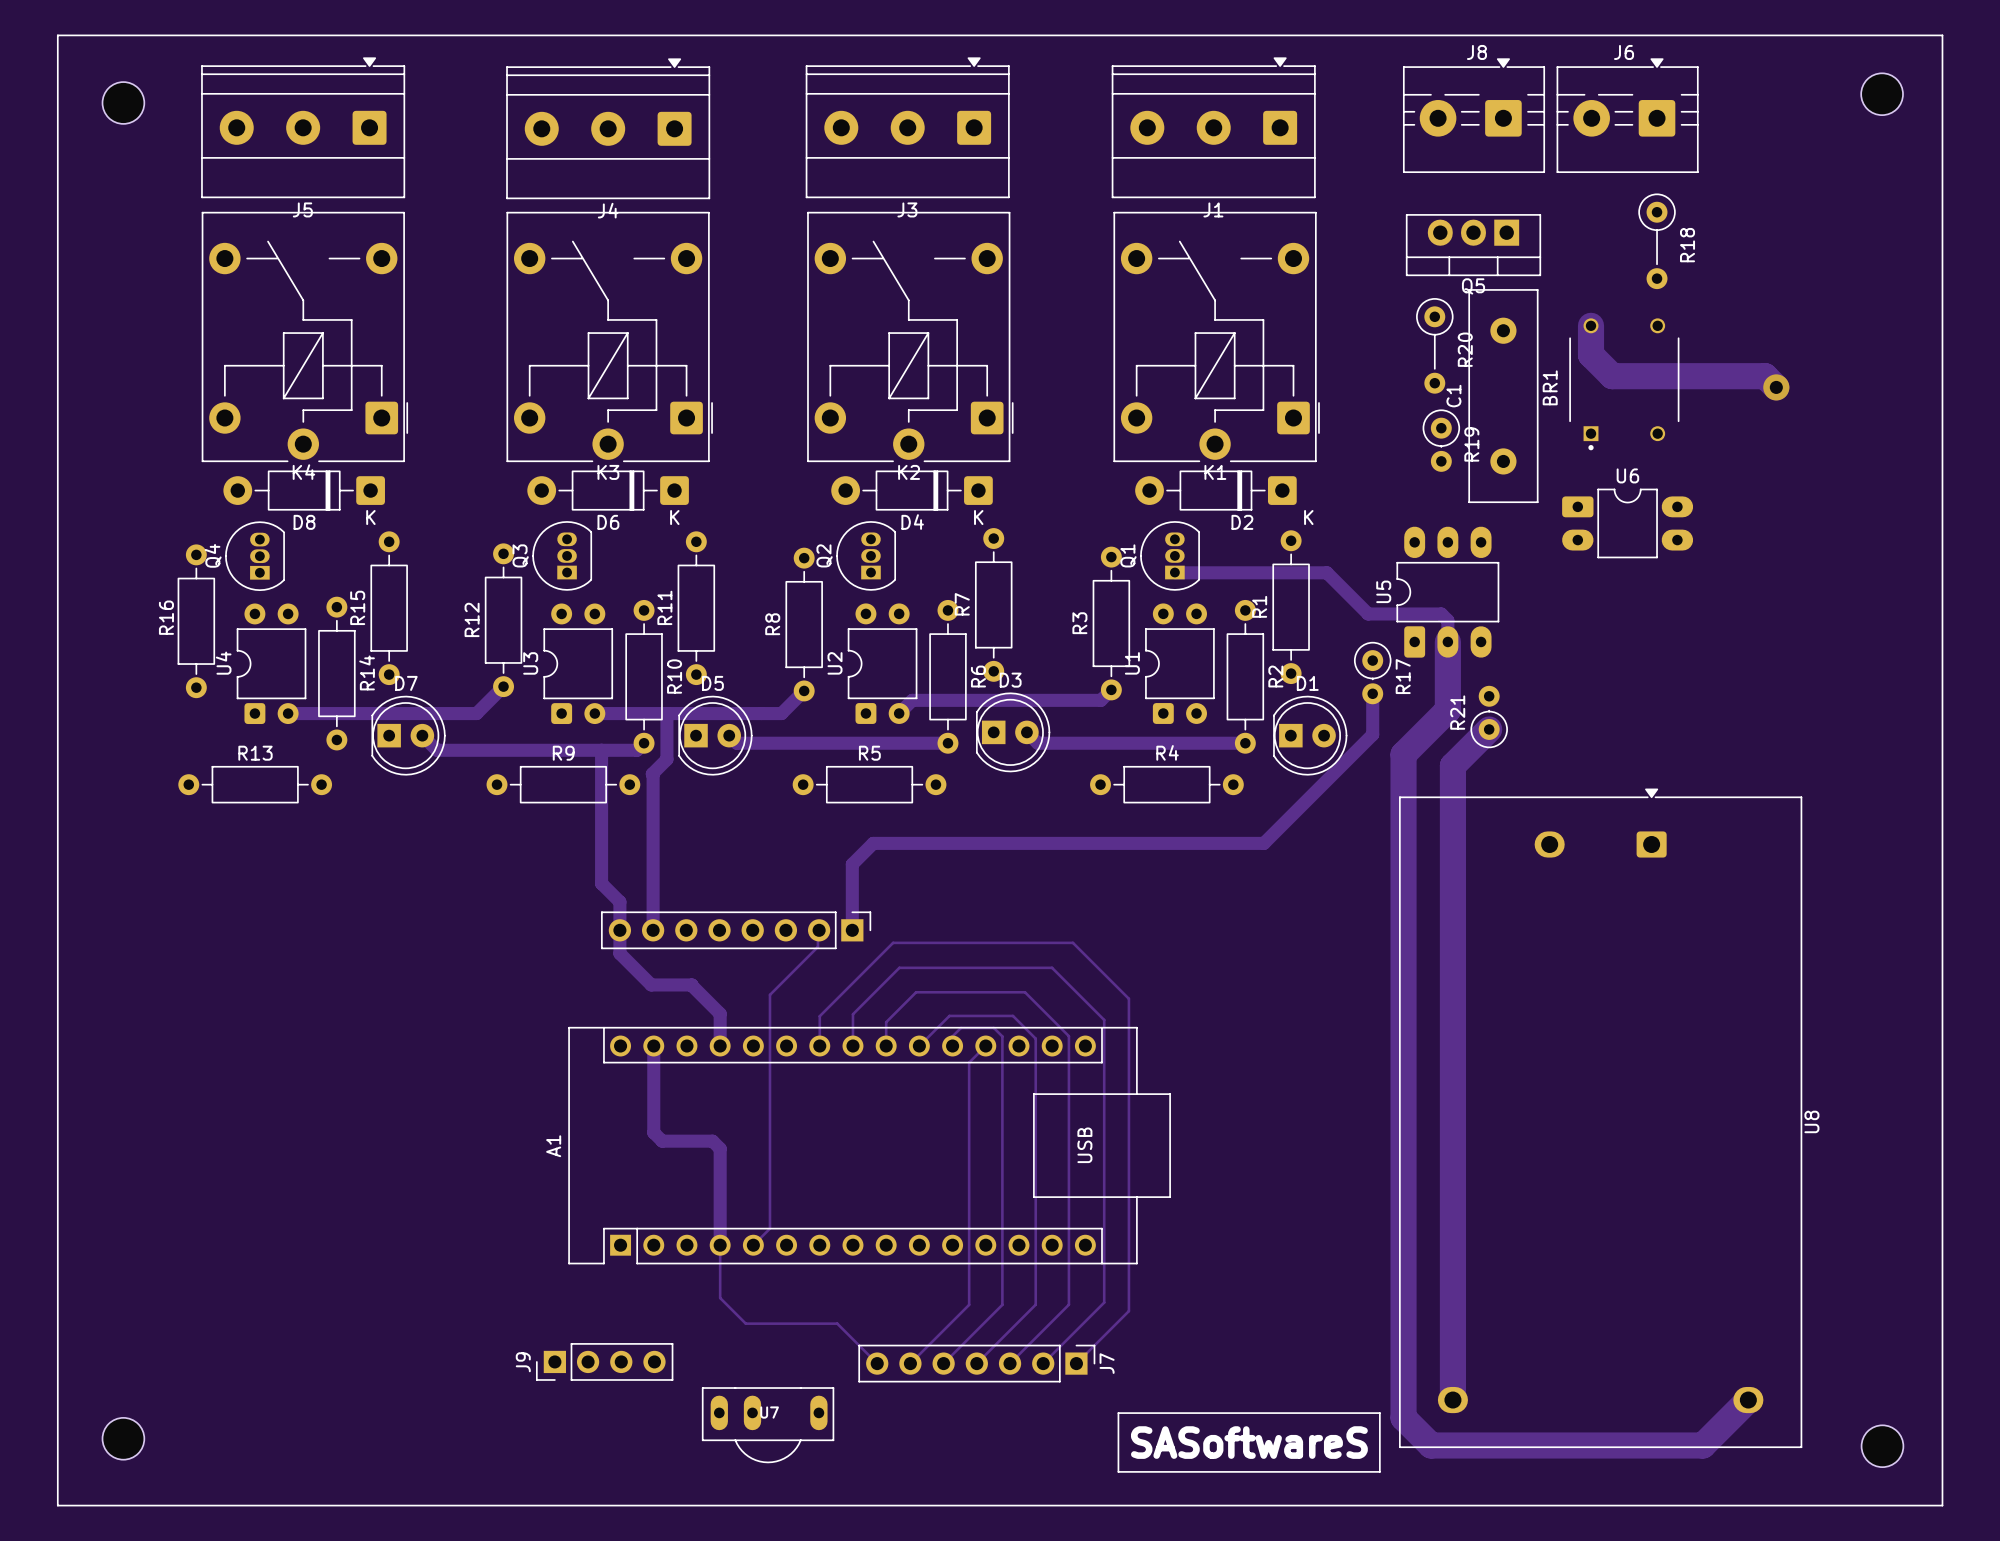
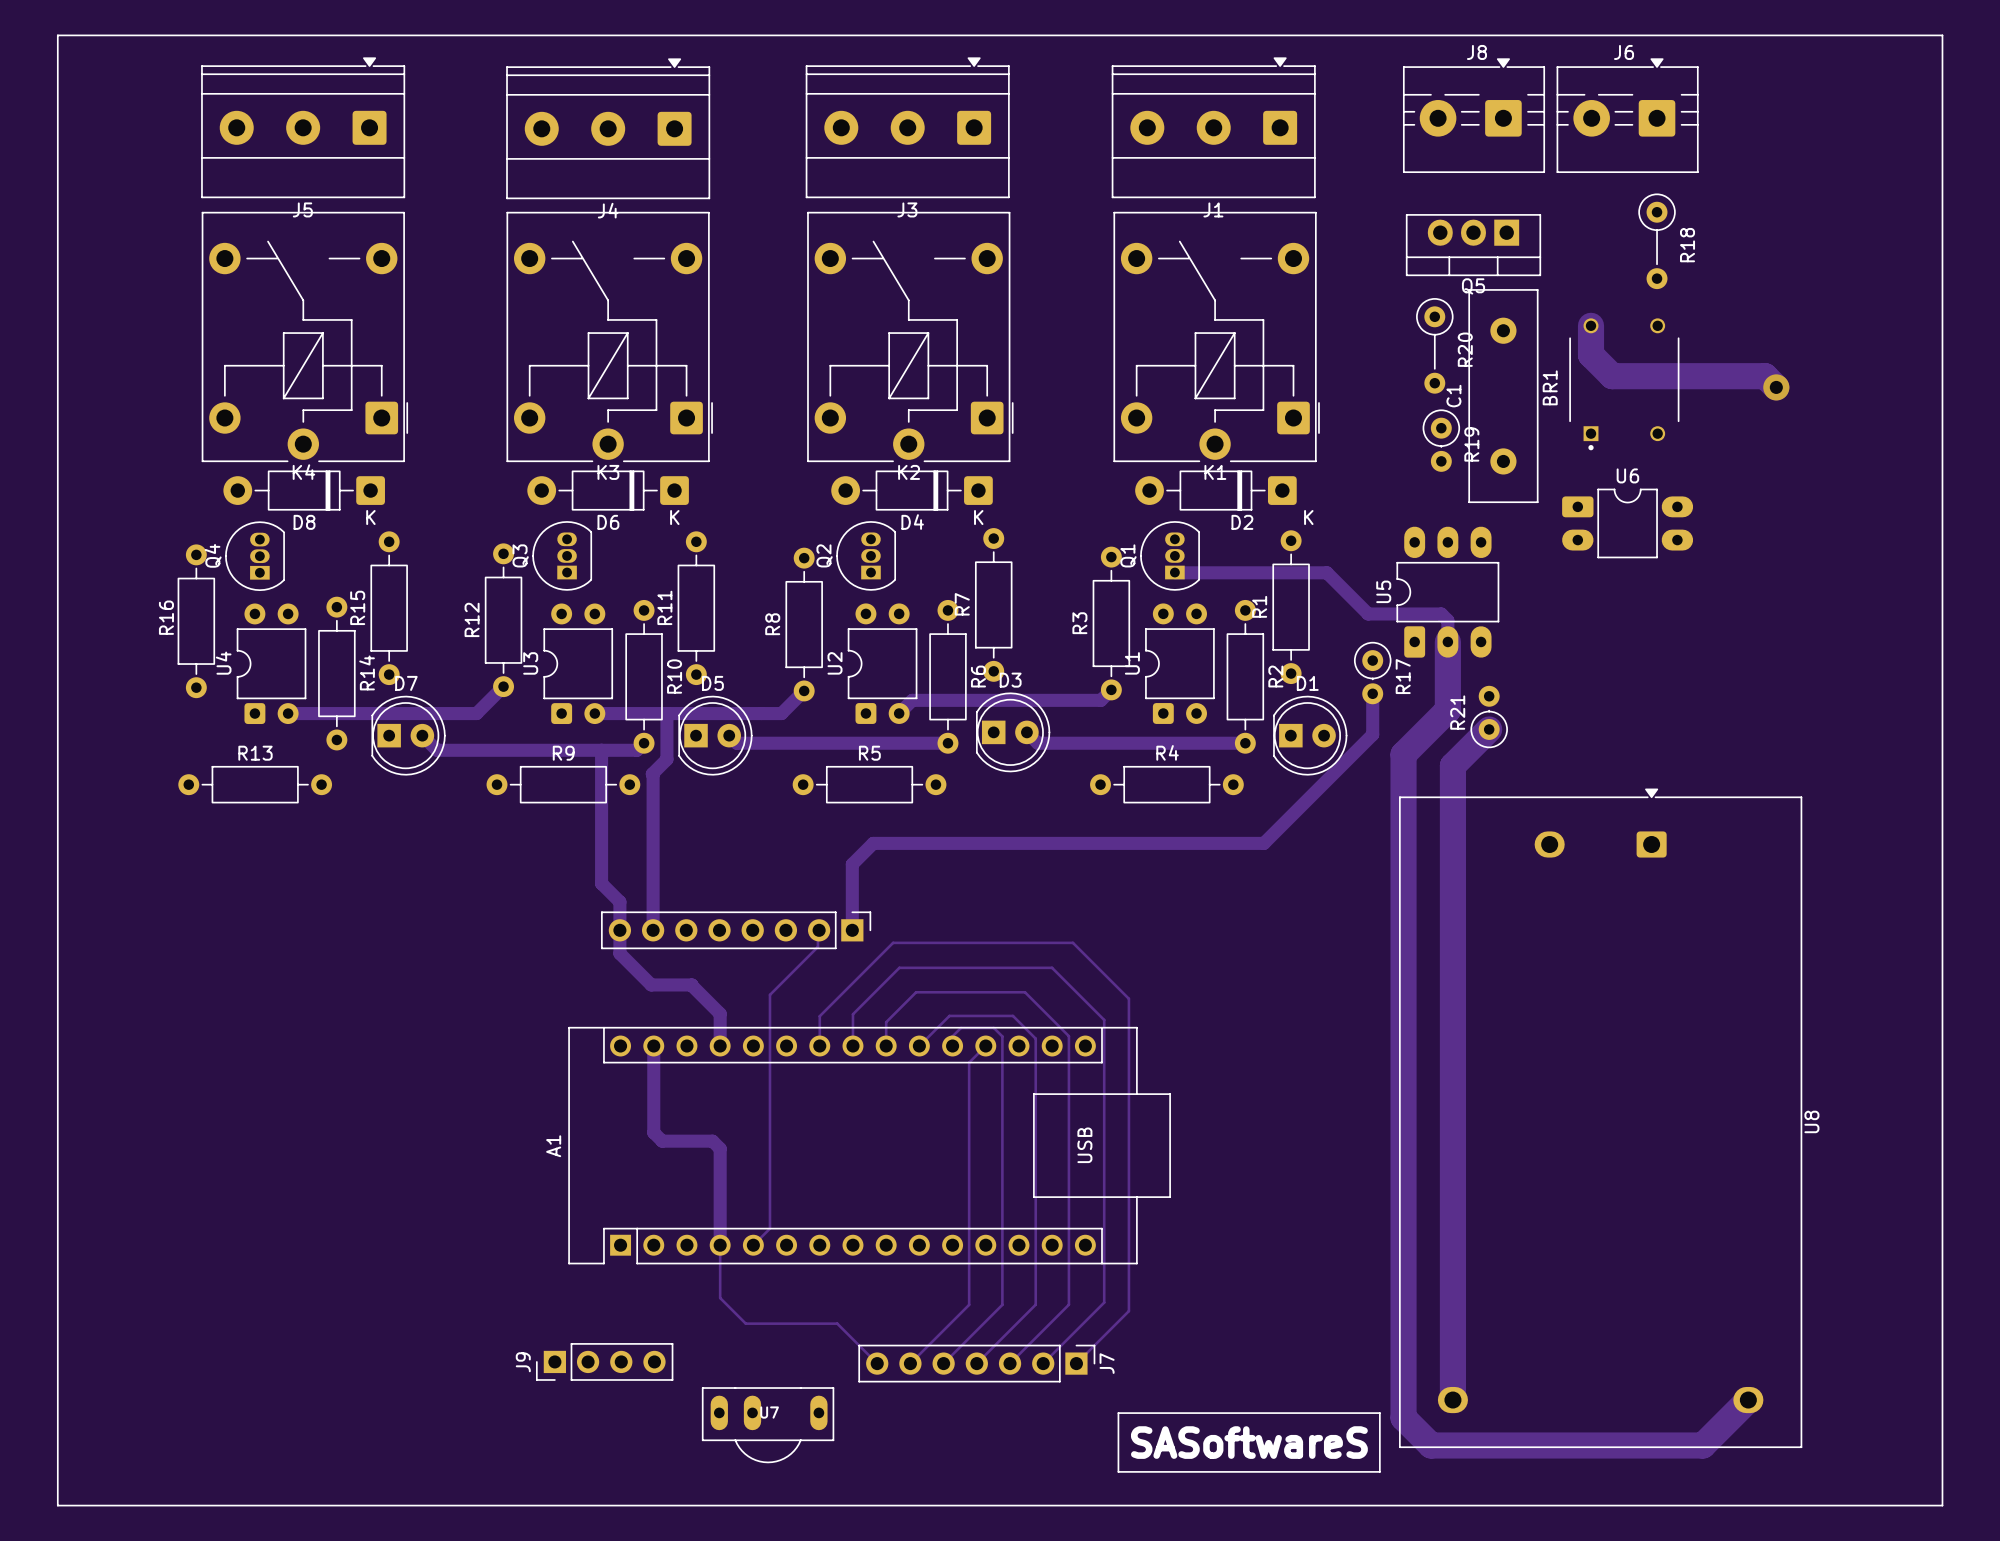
part: (1882, 94) -> none
part: (123, 102) -> none
part: (123, 1438) -> none
part: (1882, 1446) -> none

